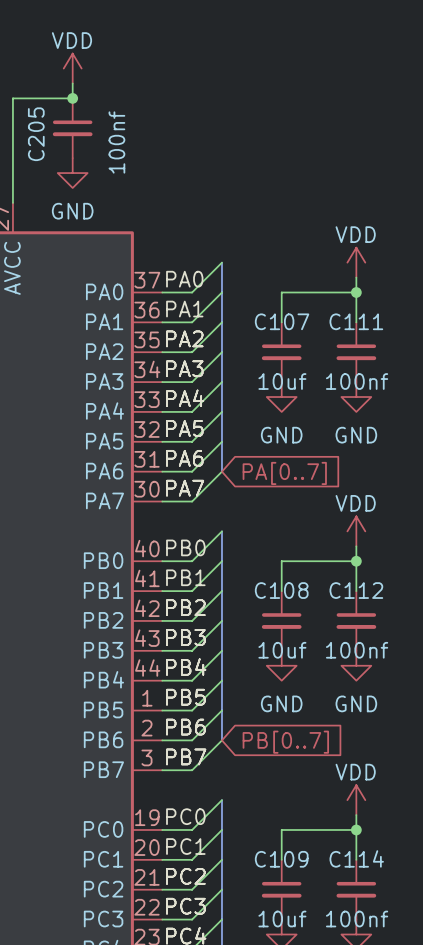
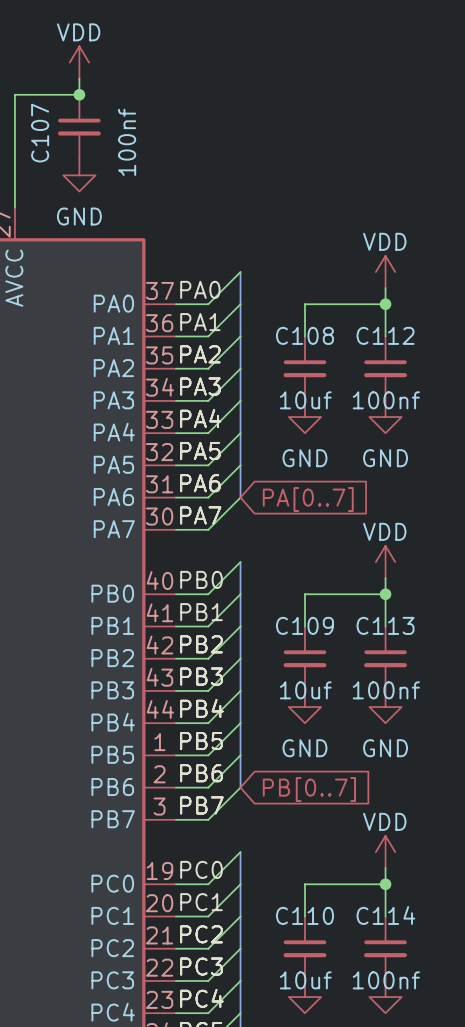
C205 name: C205 (36, 134) -> C107 (40, 133)
C107 name: C107 (282, 321) -> C108 (304, 335)
C111 name: C111 (356, 321) -> C112 (385, 335)
C108 name: C108 (281, 590) -> C109 (304, 625)
C112 name: C112 (356, 590) -> C113 (385, 625)
C109 name: C109 (281, 859) -> C110 (304, 915)

